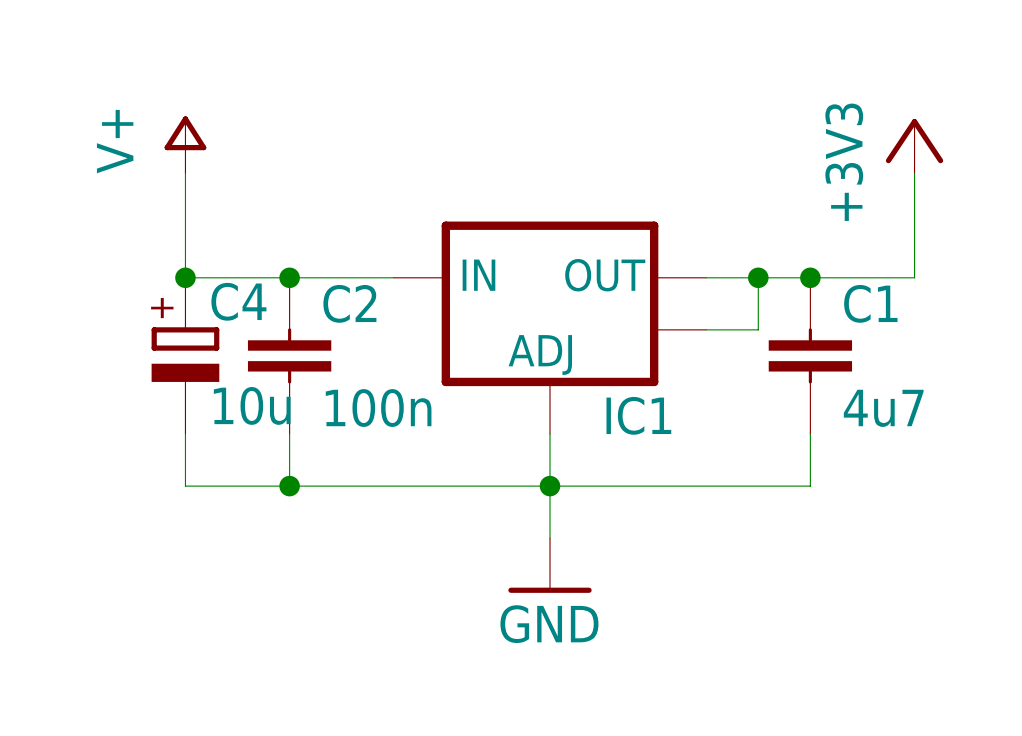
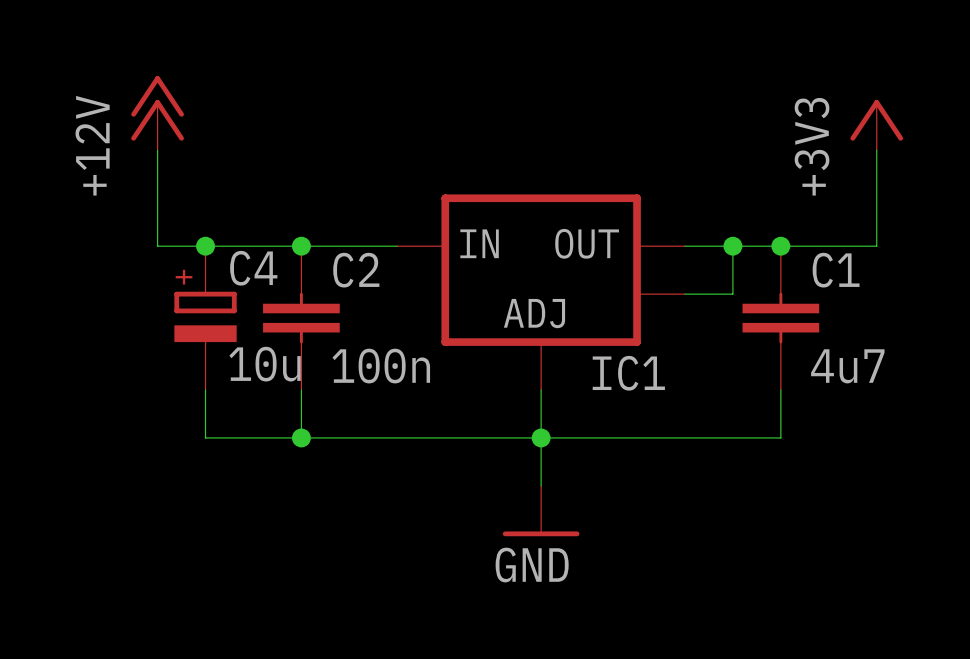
power symbol: none -> +12V (157, 113)
power symbol: V+ (185, 145) -> none
wire: (185, 173) (185, 277) -> (157, 150) (157, 246) (205, 246)

